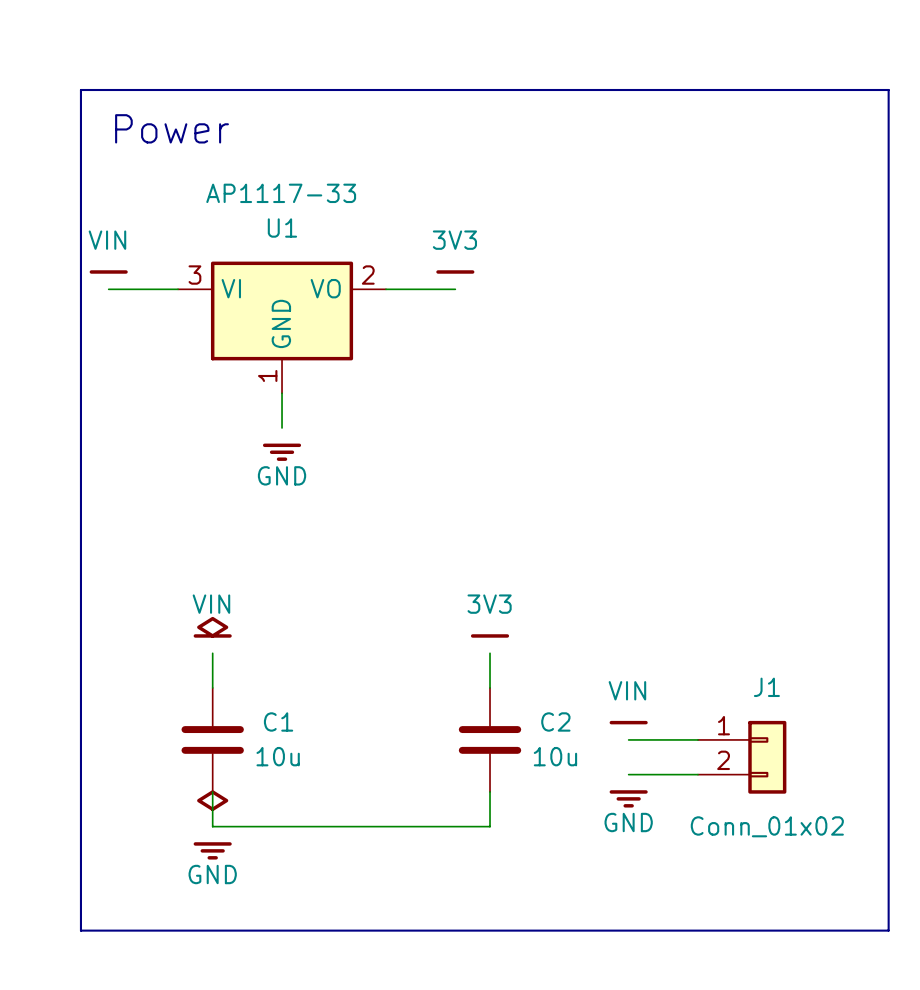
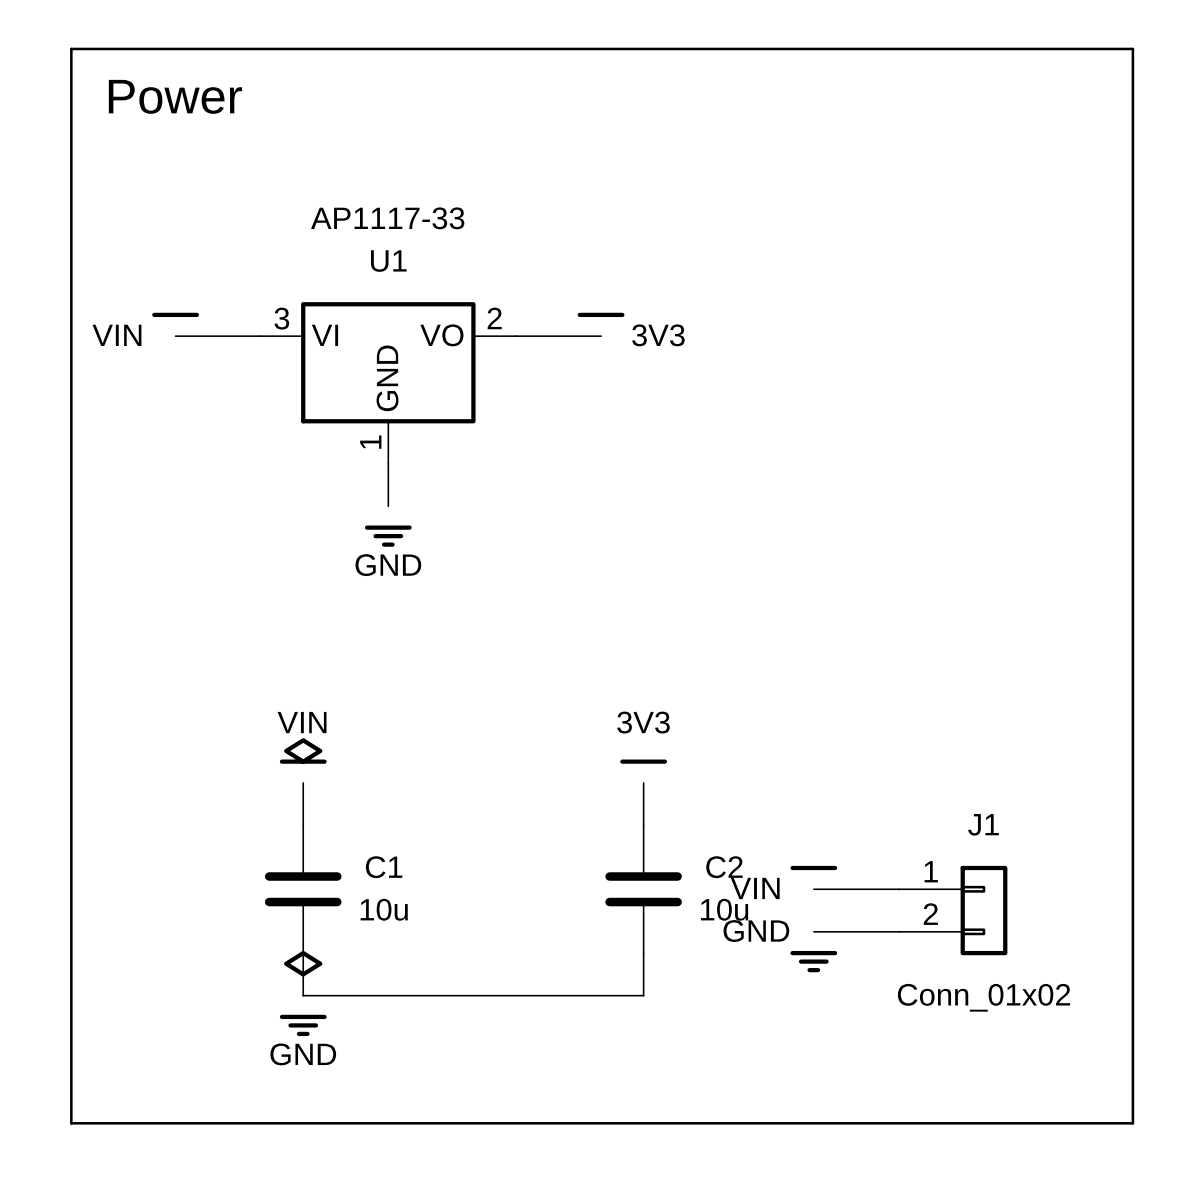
line: (888, 90) (80, 90) (80, 930) -> (1132, 91) (1132, 48) (71, 48) (71, 1123) (141, 1123)
text position: Power (172, 128) -> Power (175, 96)
power symbol text position: VIN (107, 240) -> VIN (116, 335)
power symbol text position: 3V3 (454, 240) -> 3V3 (658, 335)
power symbol text position: VIN (627, 690) -> VIN (755, 888)
power symbol text position: GND (628, 822) -> GND (756, 931)

